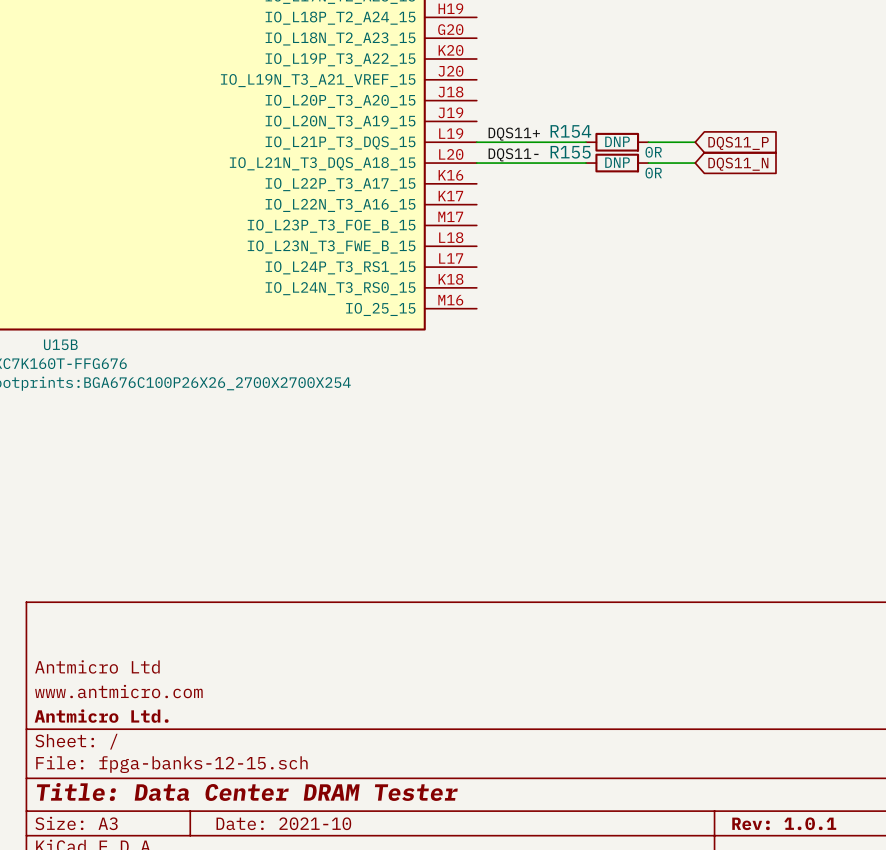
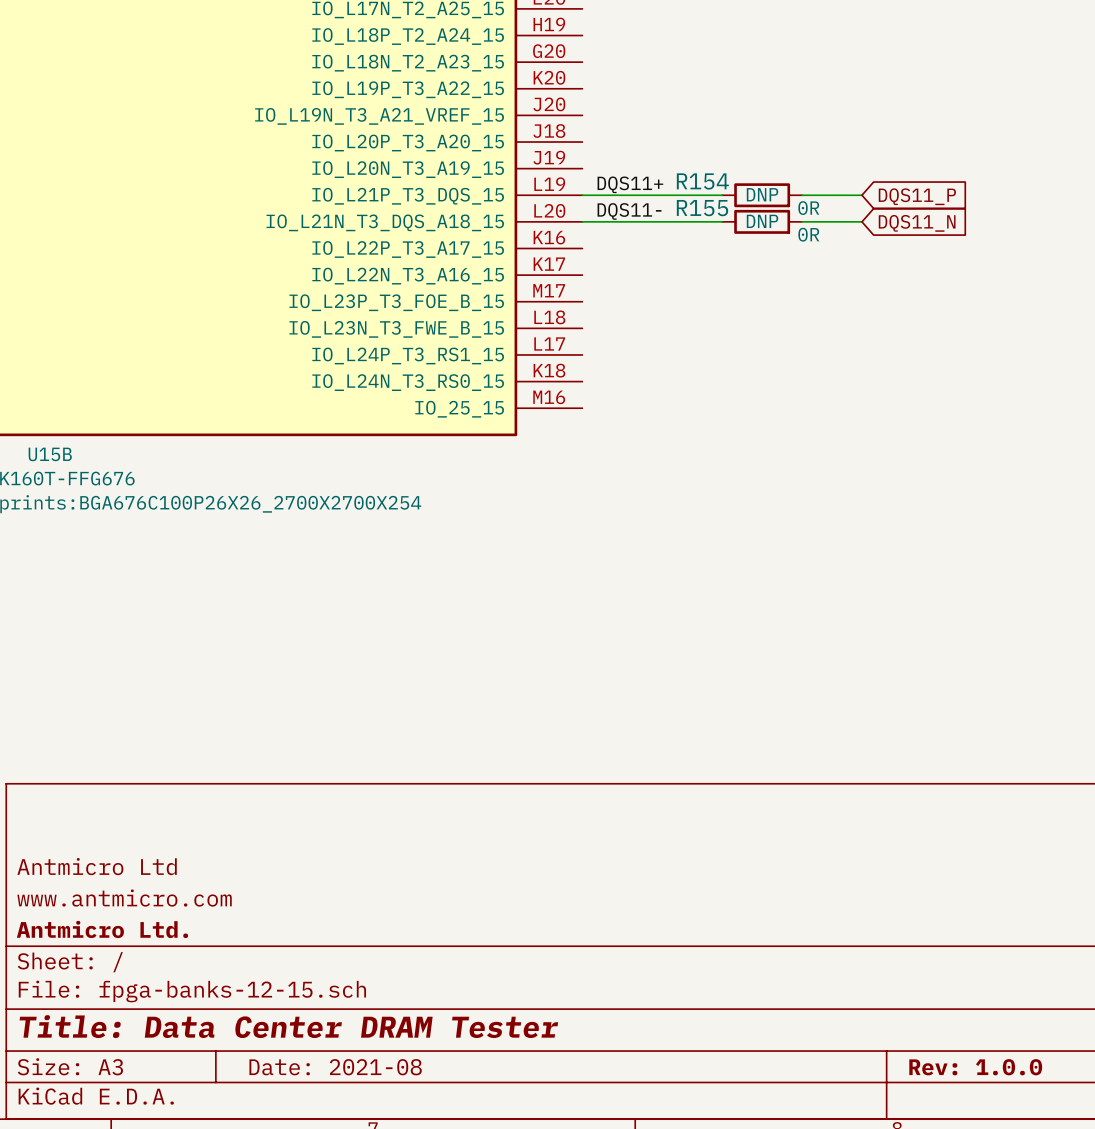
title block: Date: 2021-10 (283, 823) -> Date: 2021-08 (335, 1067)
title block: Rev: 1.0.1 (784, 823) -> Rev: 1.0.0 (975, 1067)

